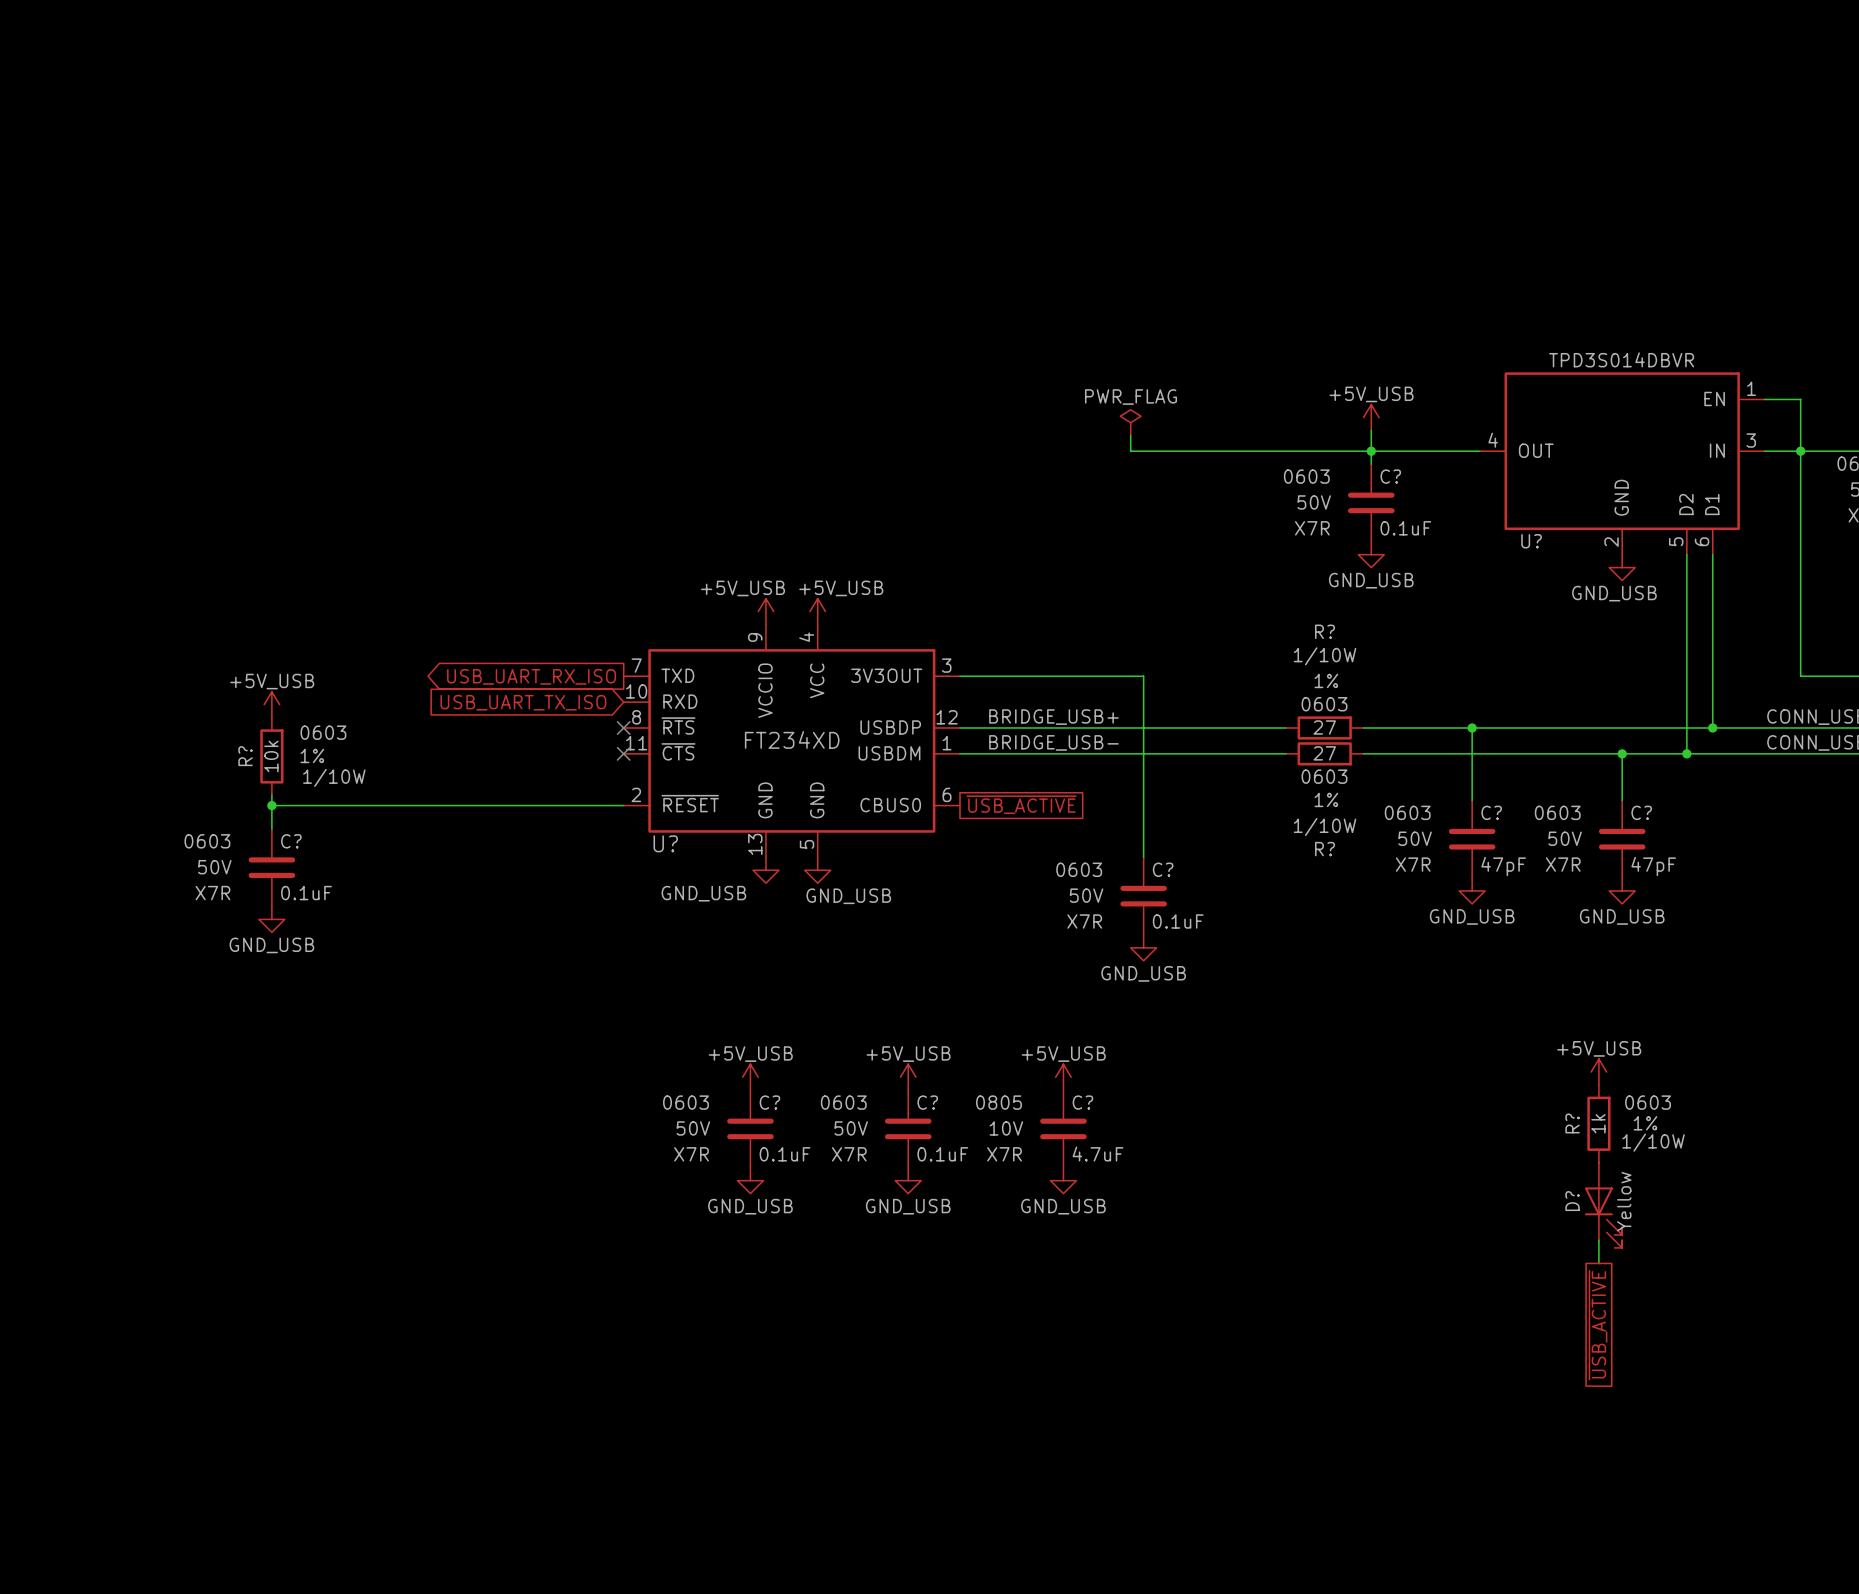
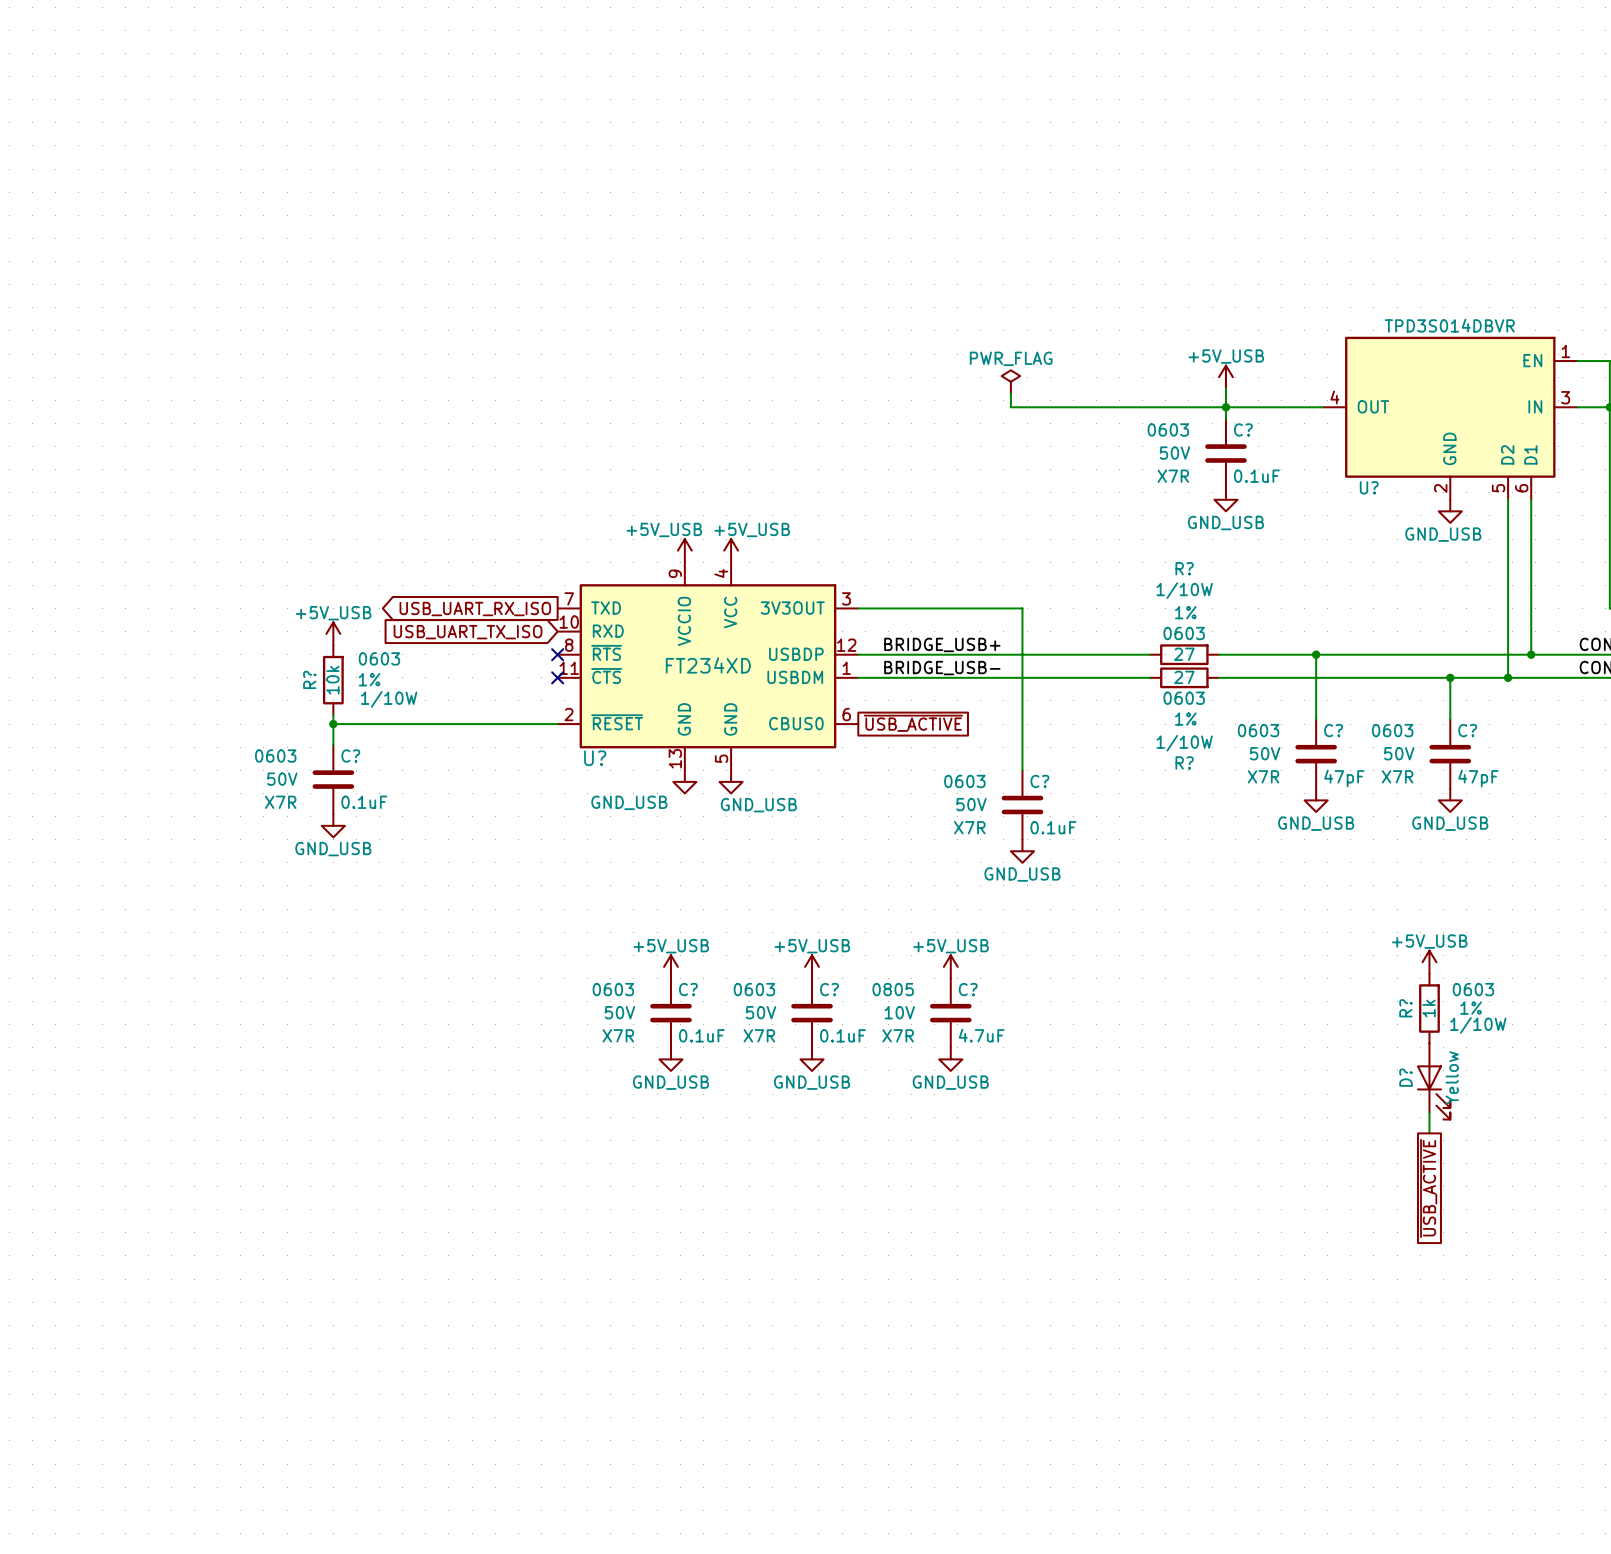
power symbol position: +5V_USB (271, 704) -> +5V_USB (333, 633)
R? position: (271, 756) -> (333, 680)
wire: (271, 795) (271, 828) -> (333, 714) (333, 744)
wire: (271, 805) (372, 805) -> none
junction: (271, 805) -> none
junction: none -> (333, 724)
C? position: (271, 867) -> (333, 779)
power symbol position: GND_USB (271, 919) -> GND_USB (333, 825)

